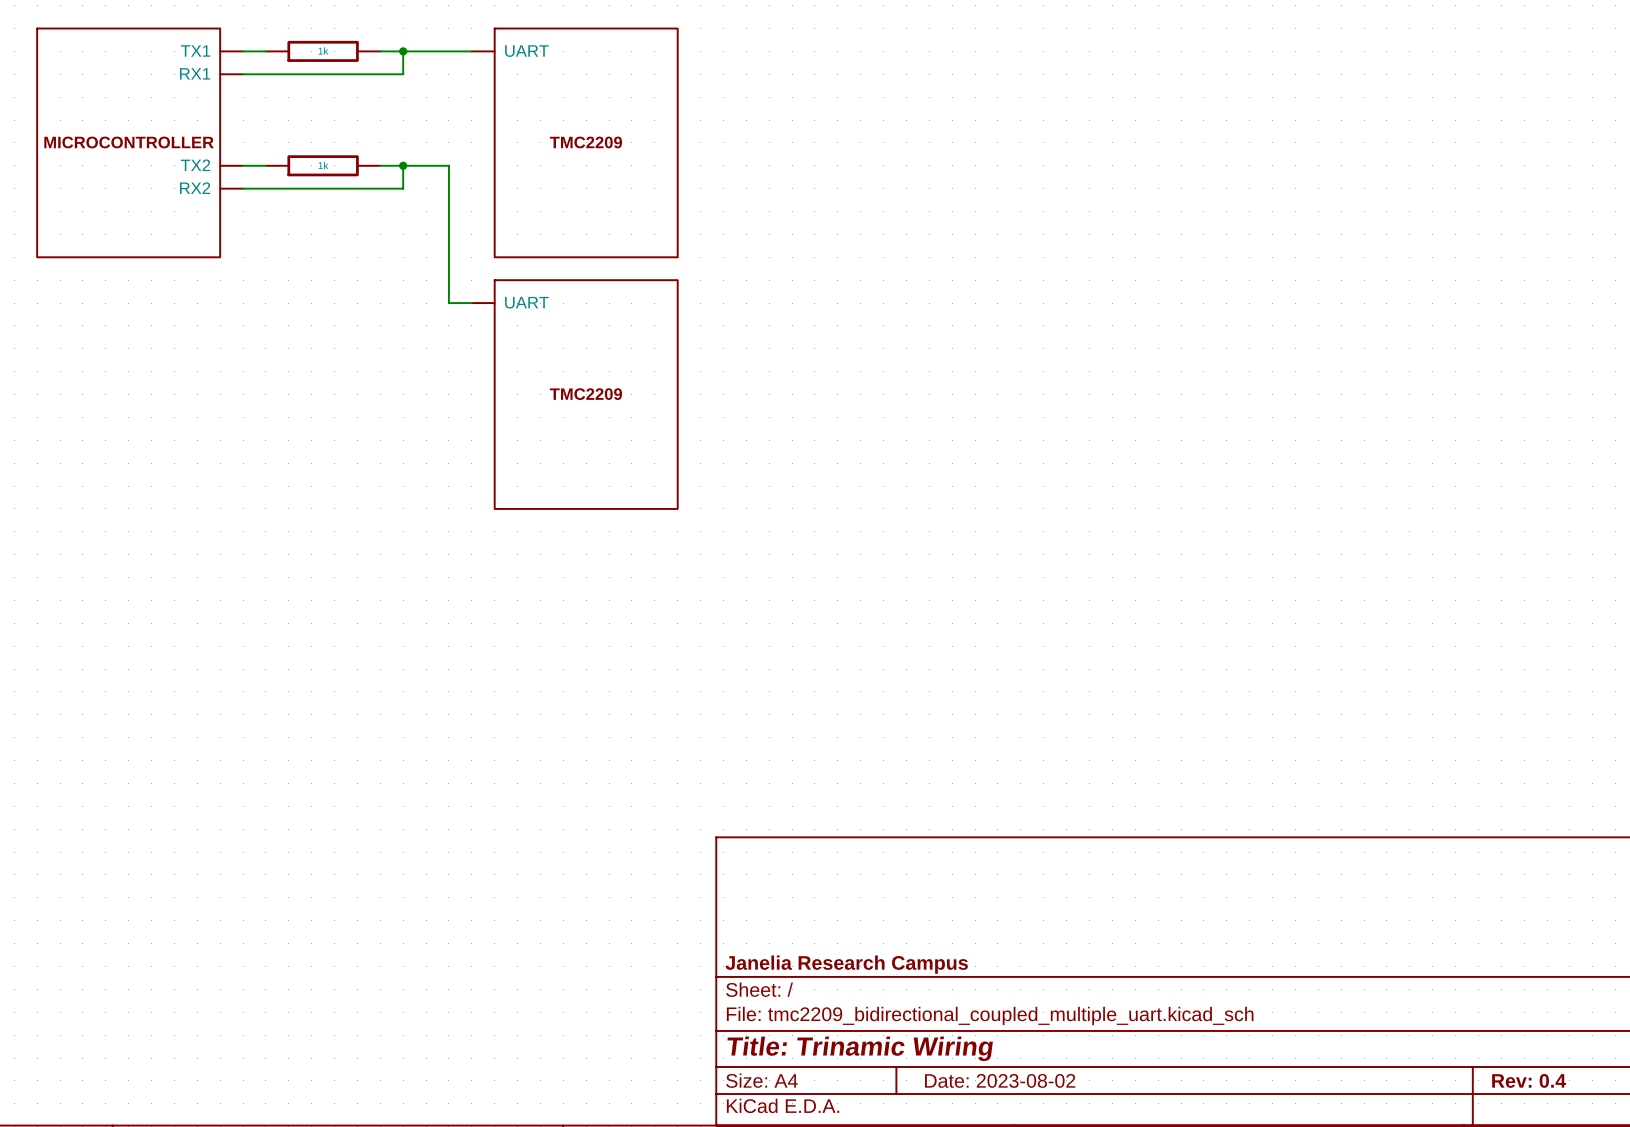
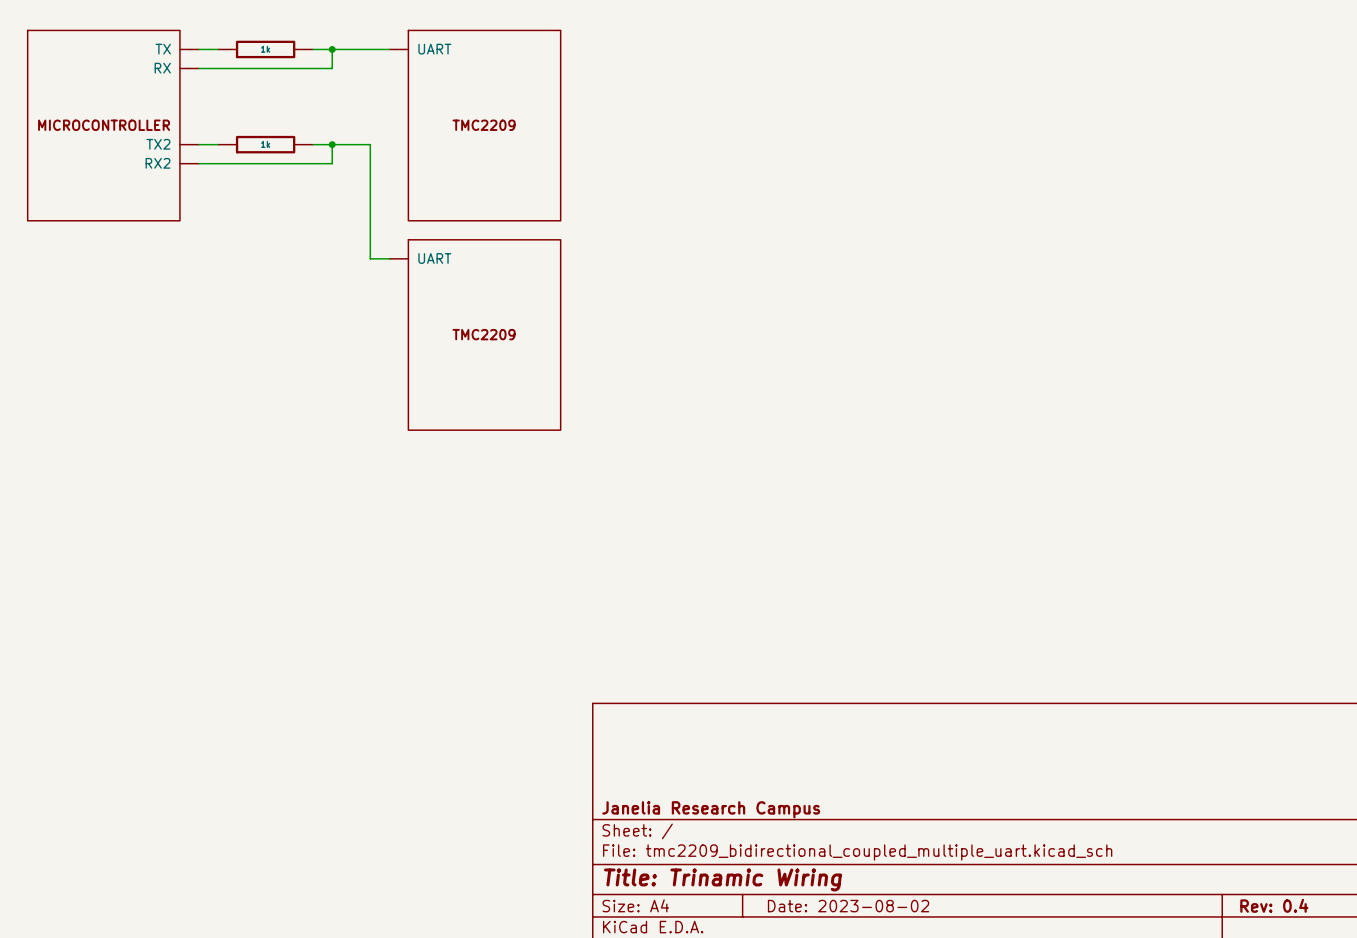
part pin name: TX1 (195, 50) -> TX (163, 49)
part pin name: RX1 (195, 73) -> RX (162, 68)

